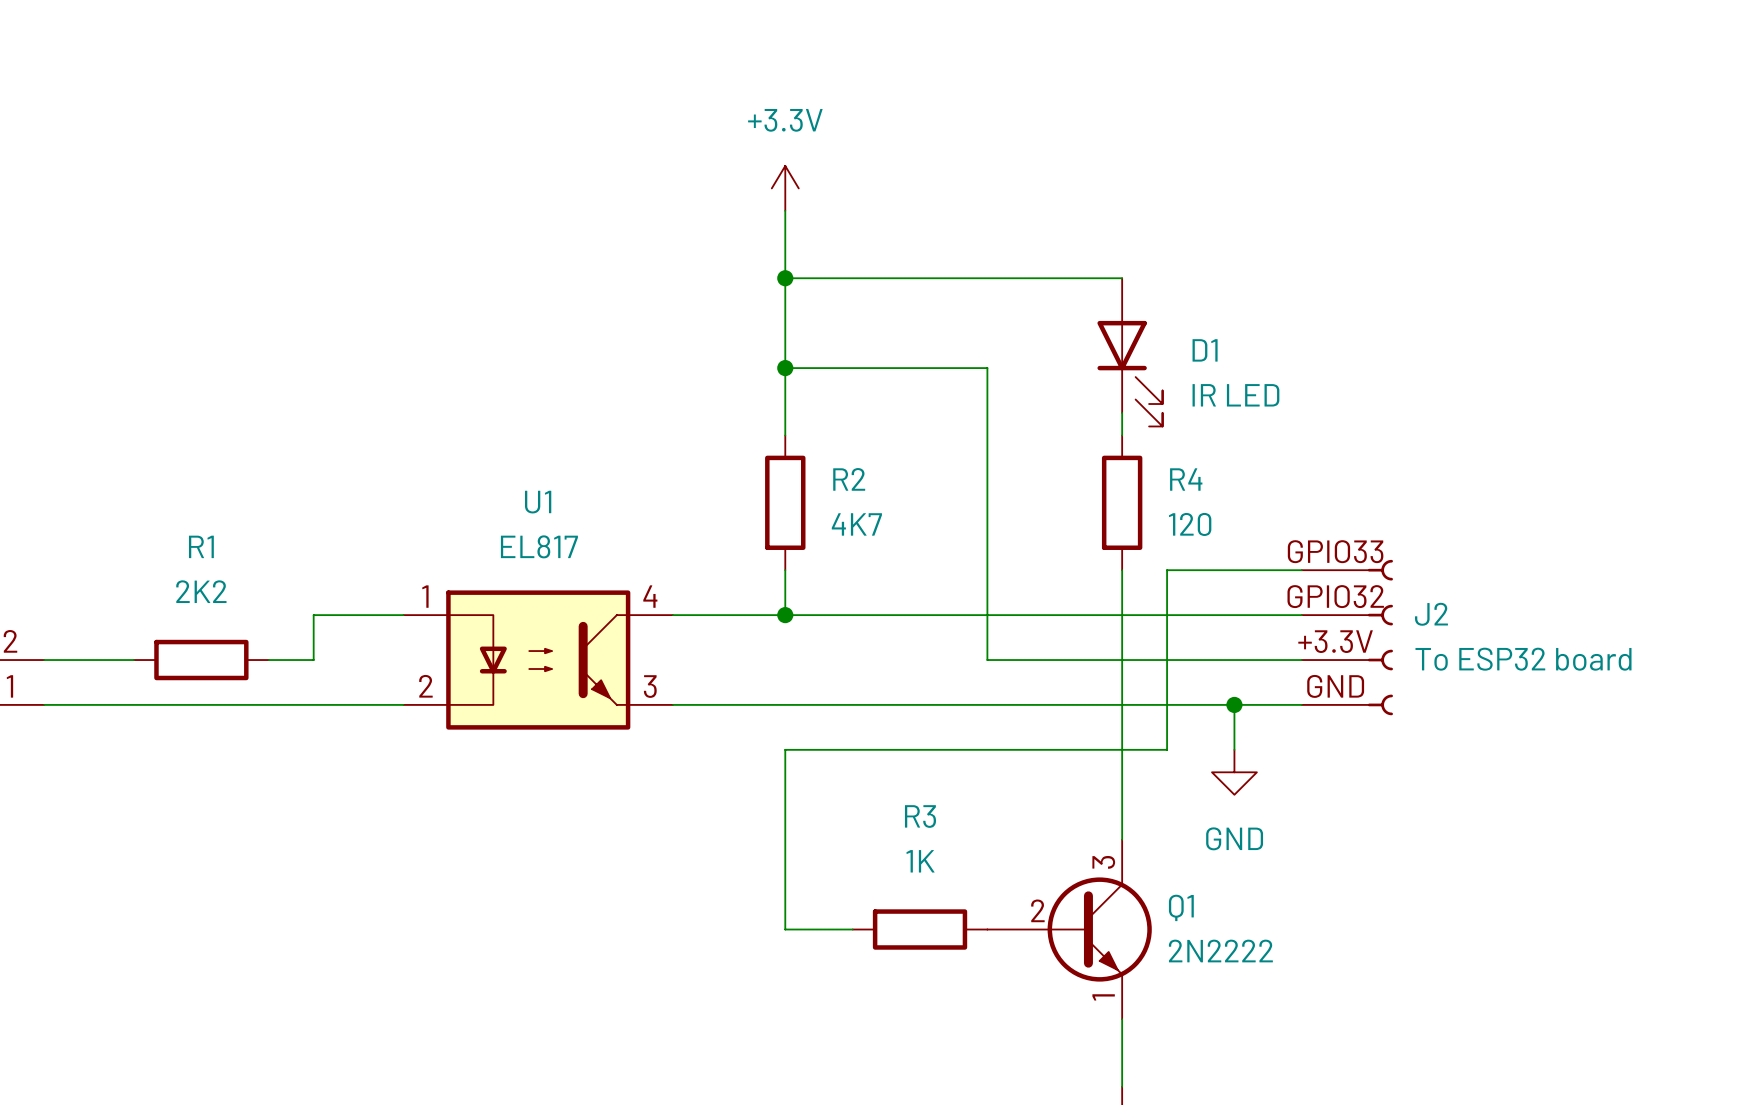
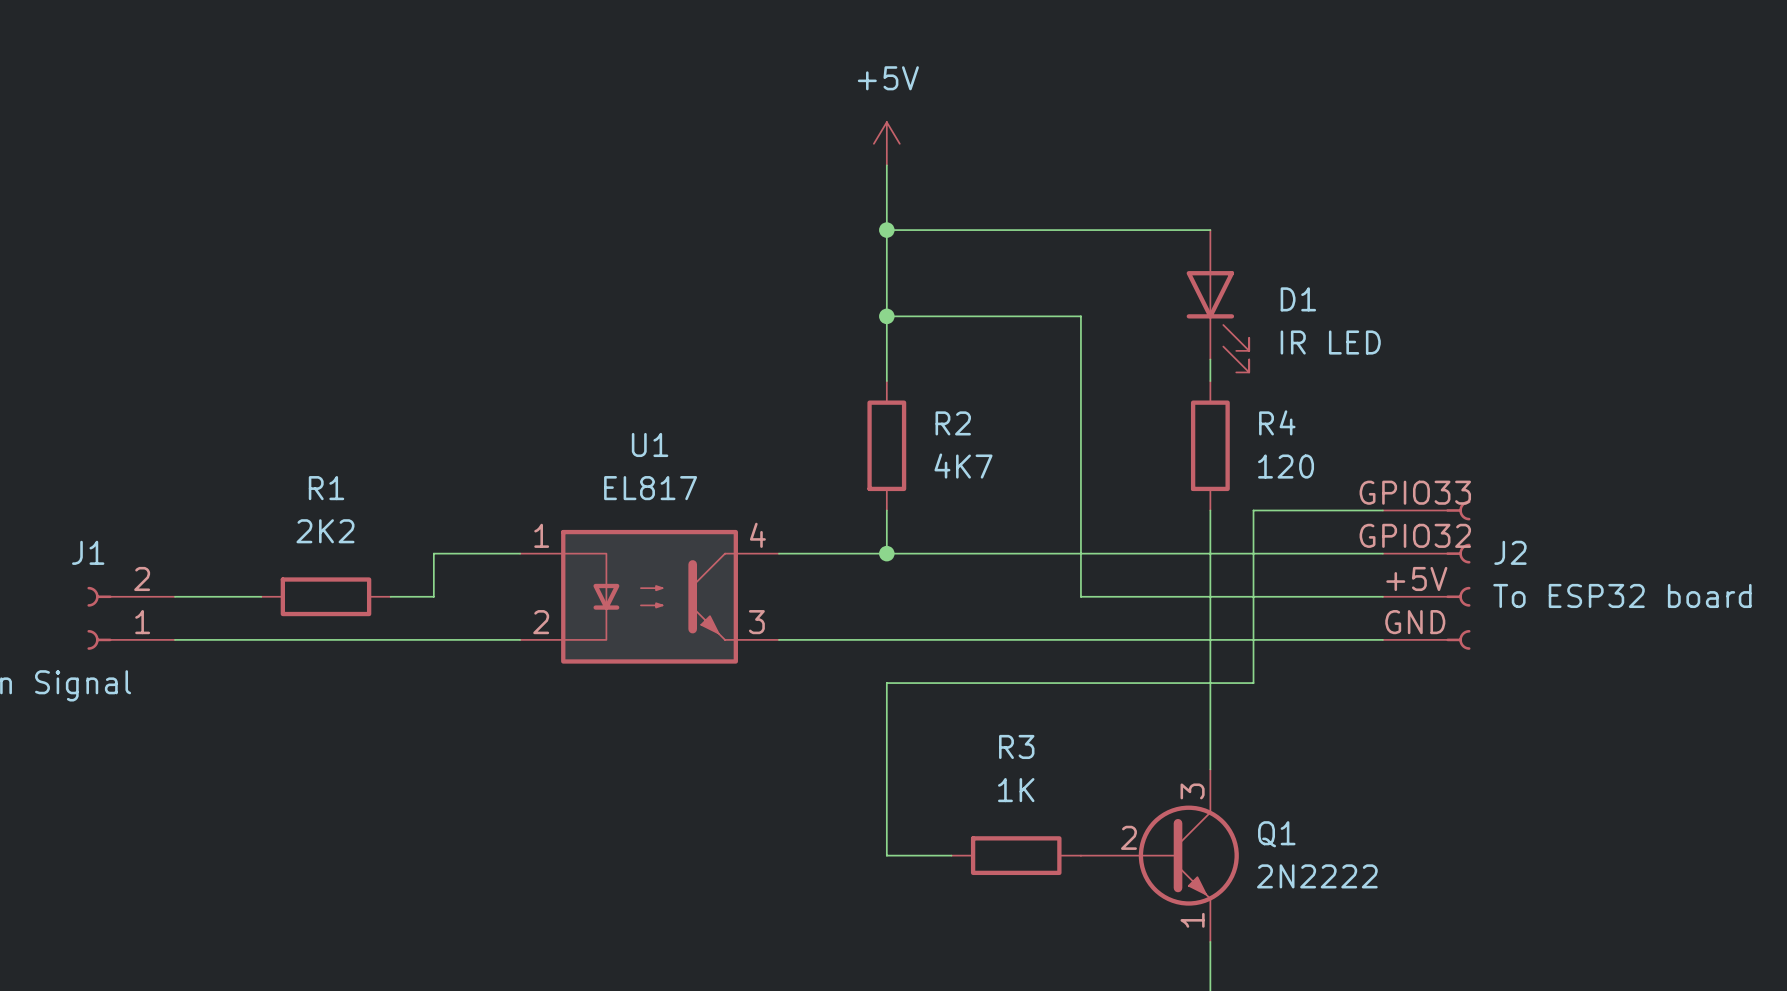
power symbol: +3.3V (785, 188) -> +5V (886, 143)
J2 pin number: +3.3V (1335, 641) -> +5V (1416, 578)
wire: (1234, 704) (1234, 749) -> none
junction: (1234, 704) -> none
power symbol: GND (1234, 772) -> none

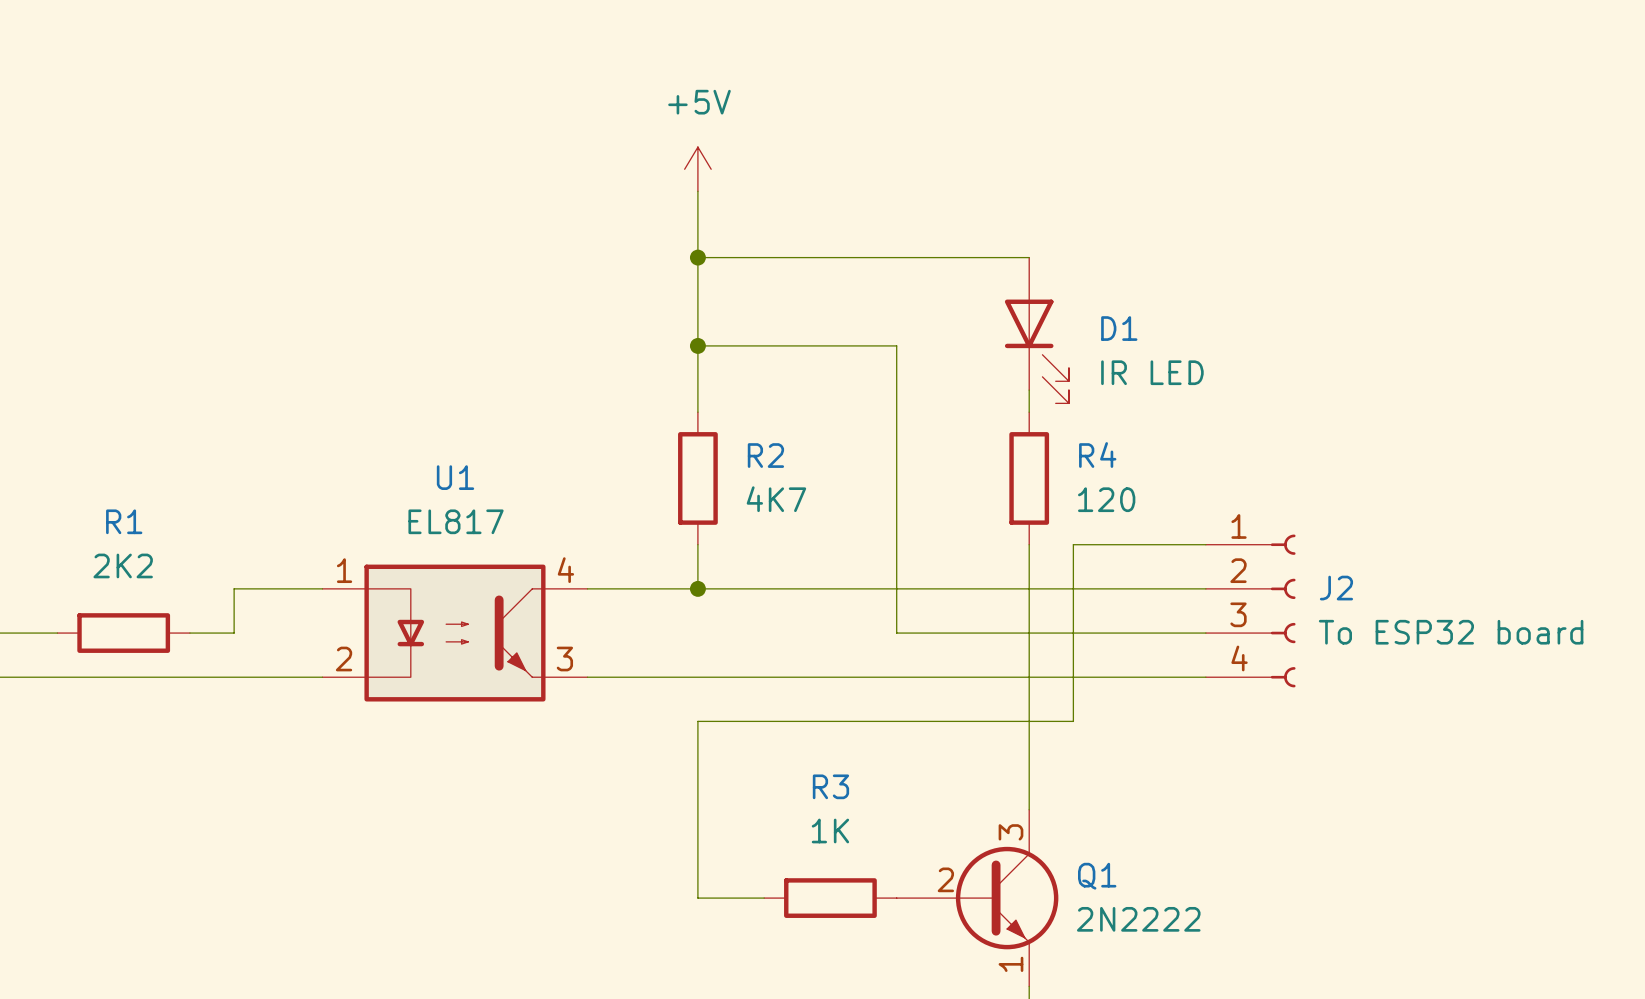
J2 pin number: GPIO33 (1415, 492) -> 1 (1239, 526)
J2 pin number: GPIO32 (1415, 535) -> 2 (1238, 570)
J2 pin number: +5V (1416, 578) -> 3 (1238, 614)
J2 pin number: GND (1415, 622) -> 4 (1239, 658)

